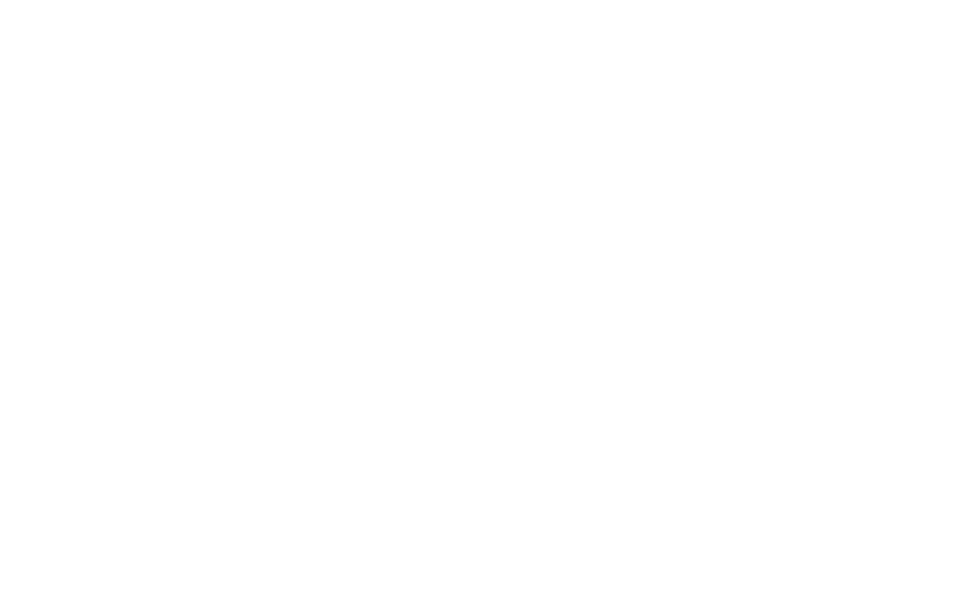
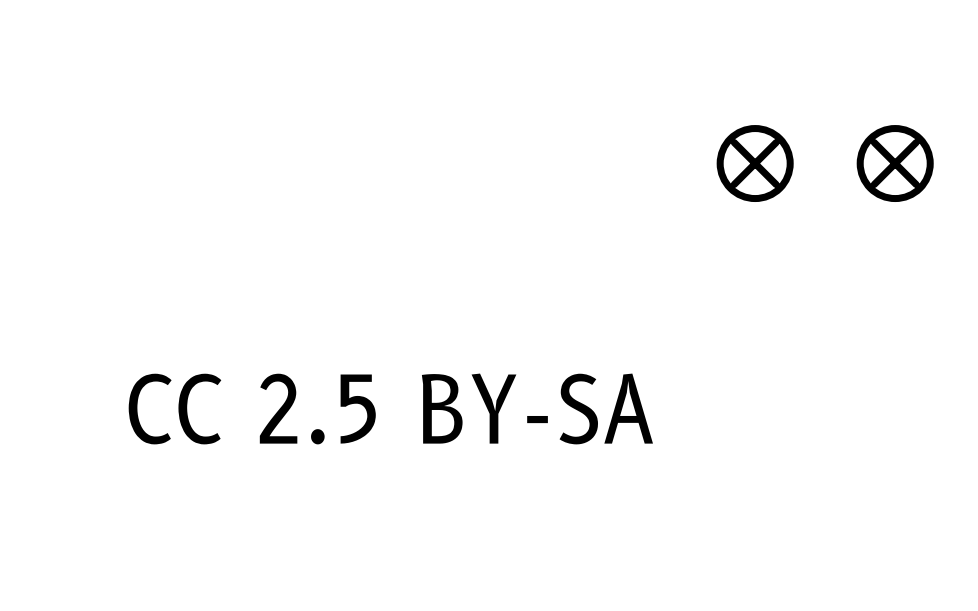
part: none -> (755, 163)
part: none -> (895, 163)
text: none -> CC 2.5 BY-SA (390, 408)

